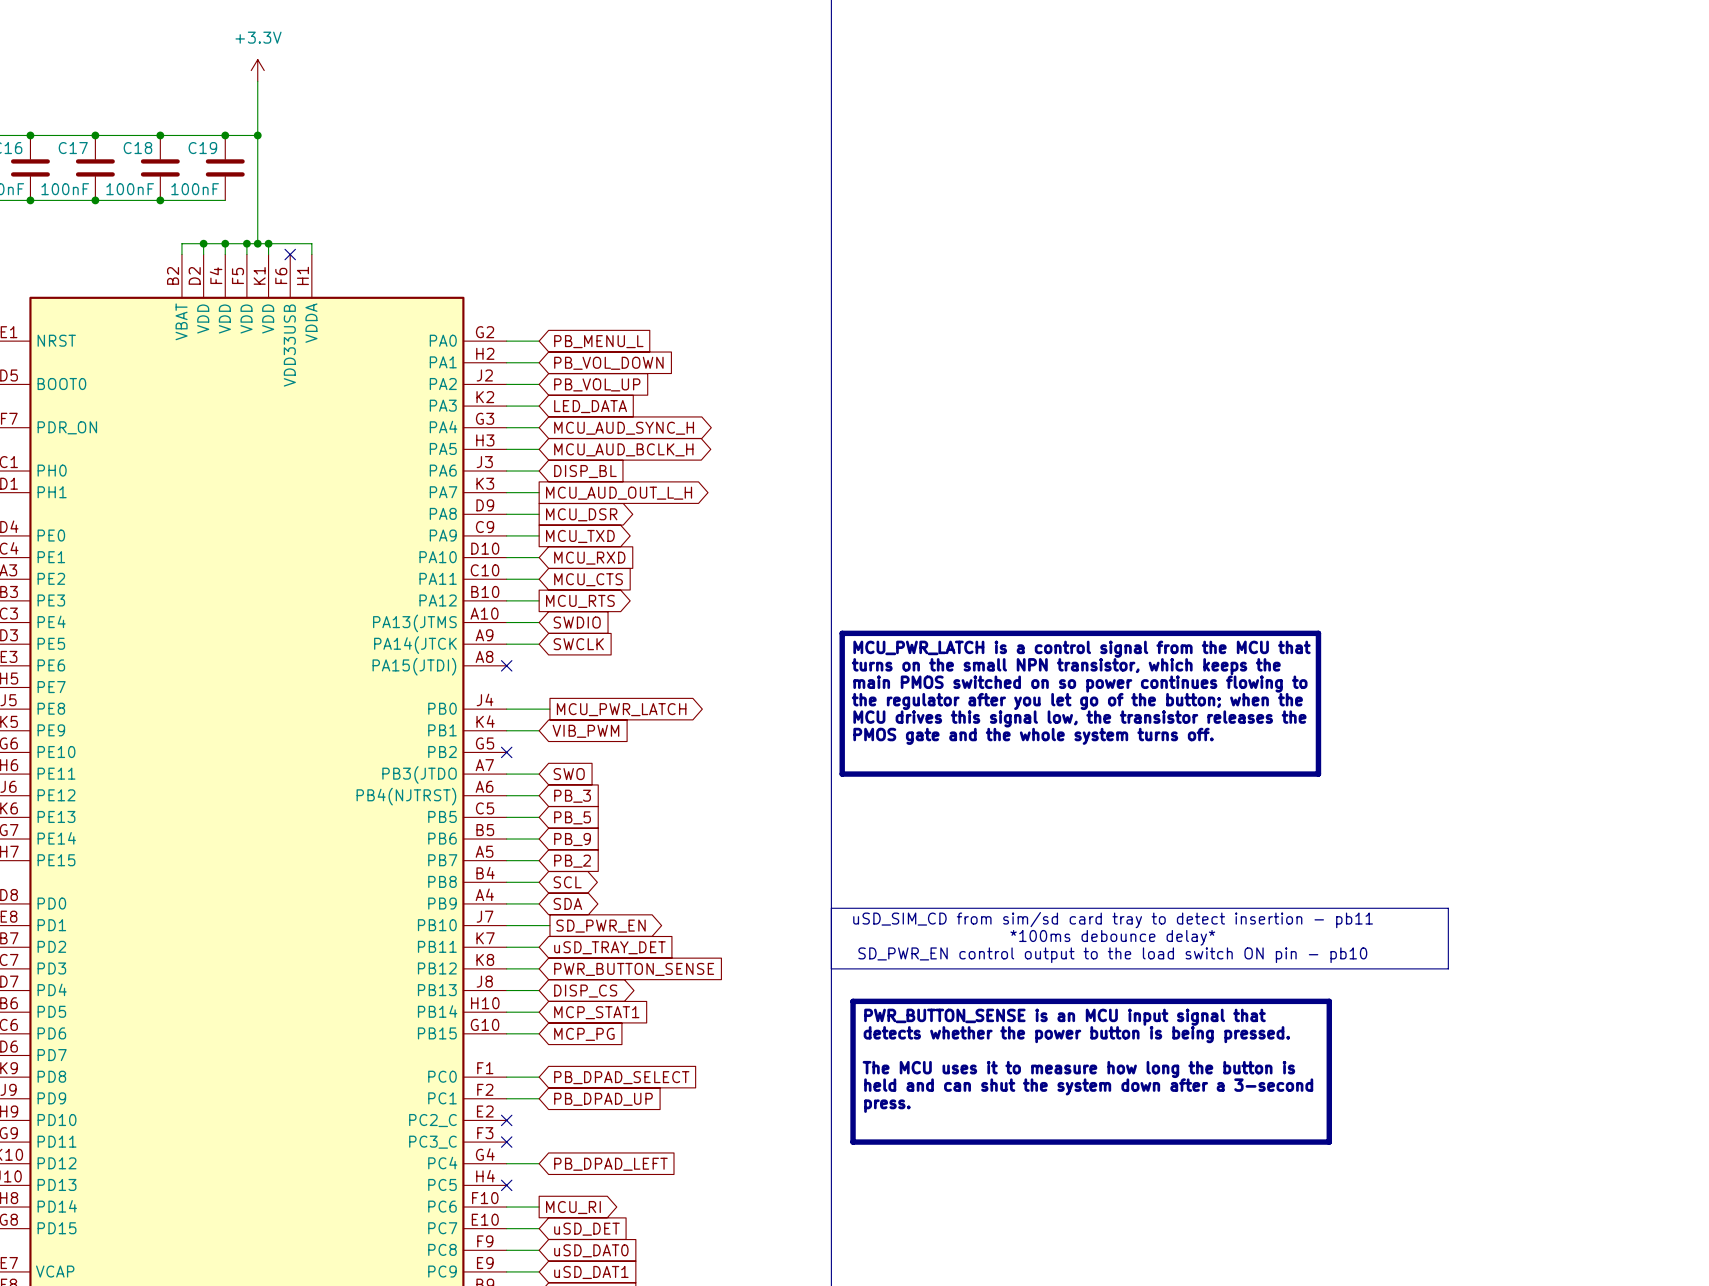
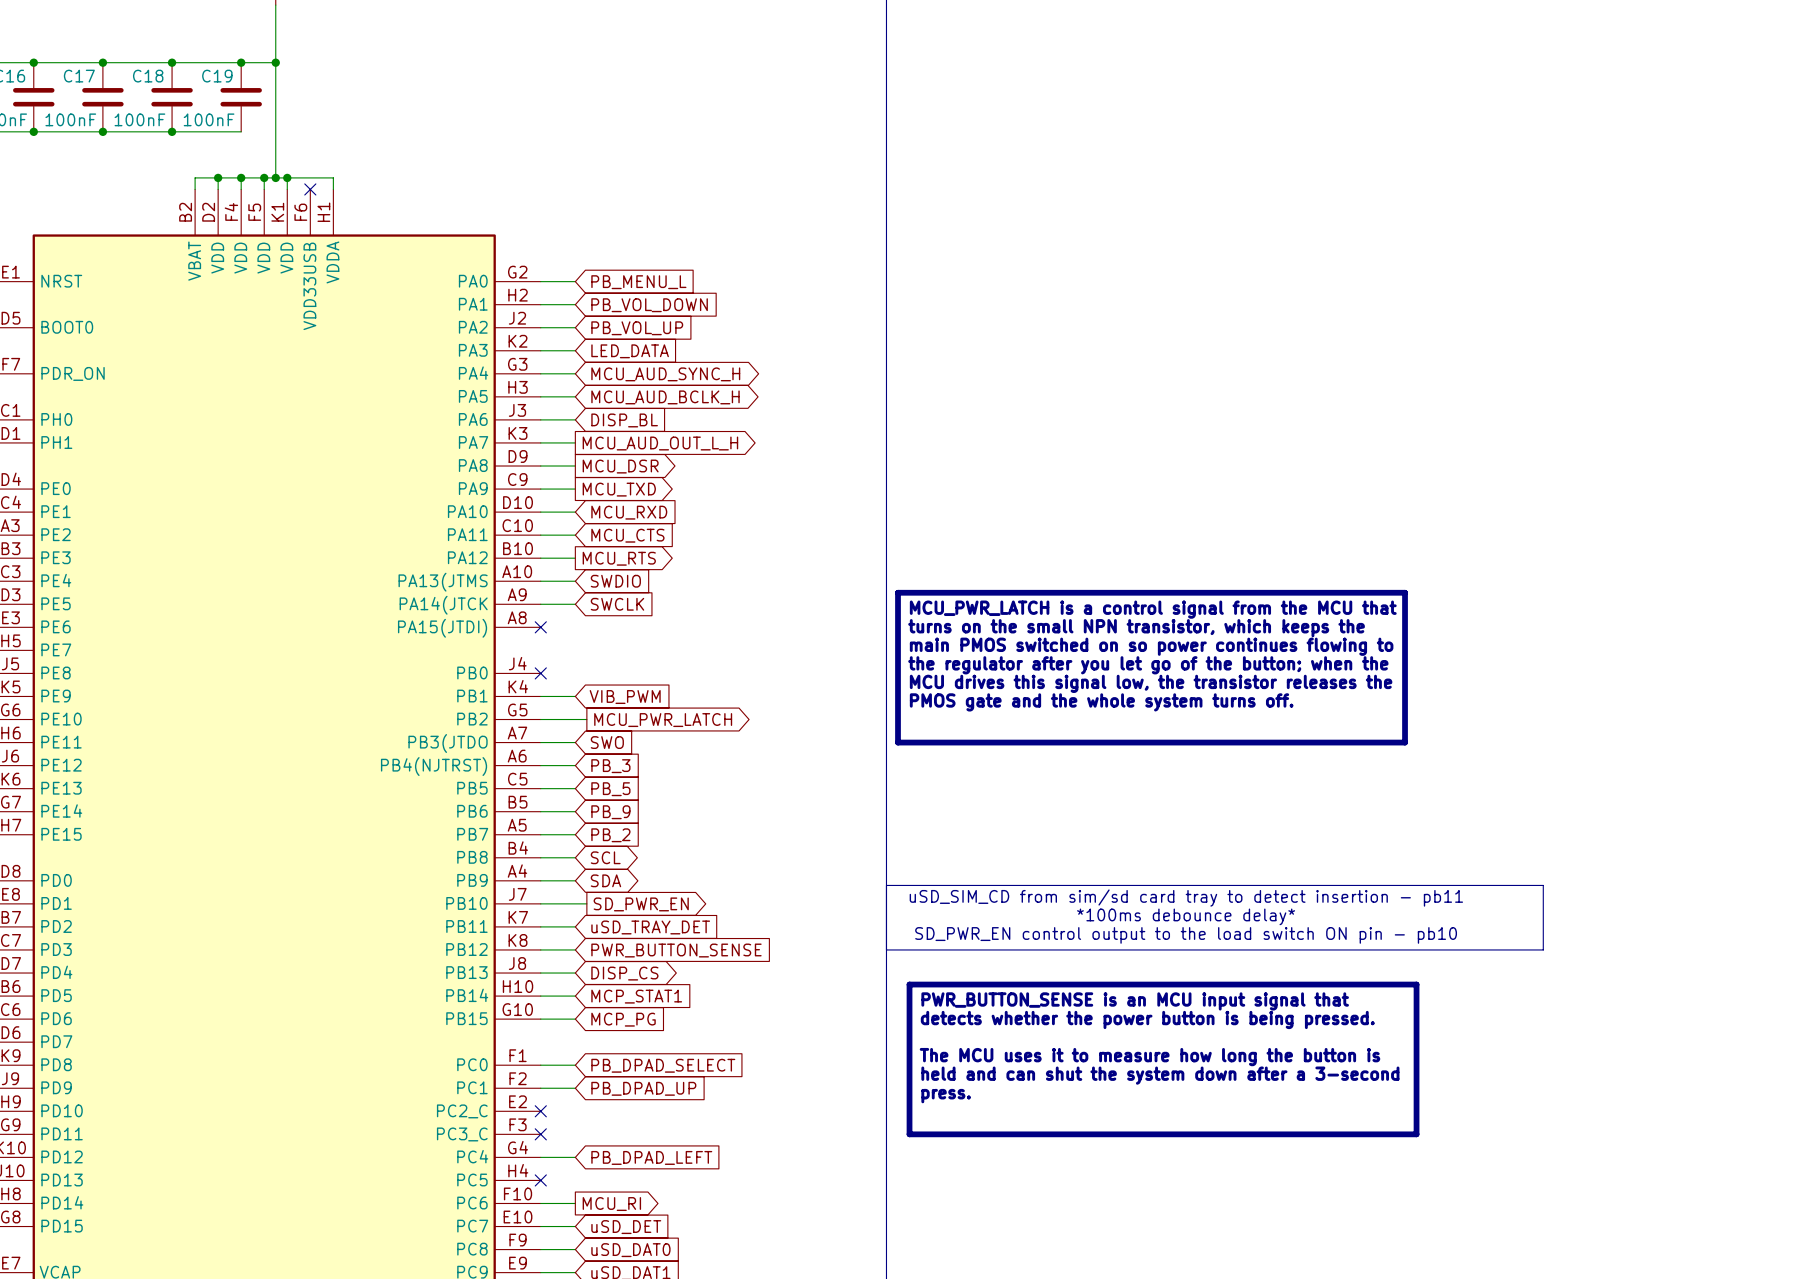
wire: (506, 709) (549, 709) -> (540, 719) (586, 719)
global label position: MCU_PWR_LATCH (621, 709) -> MCU_PWR_LATCH (663, 720)
no-connect mark position: (506, 752) -> (540, 673)

